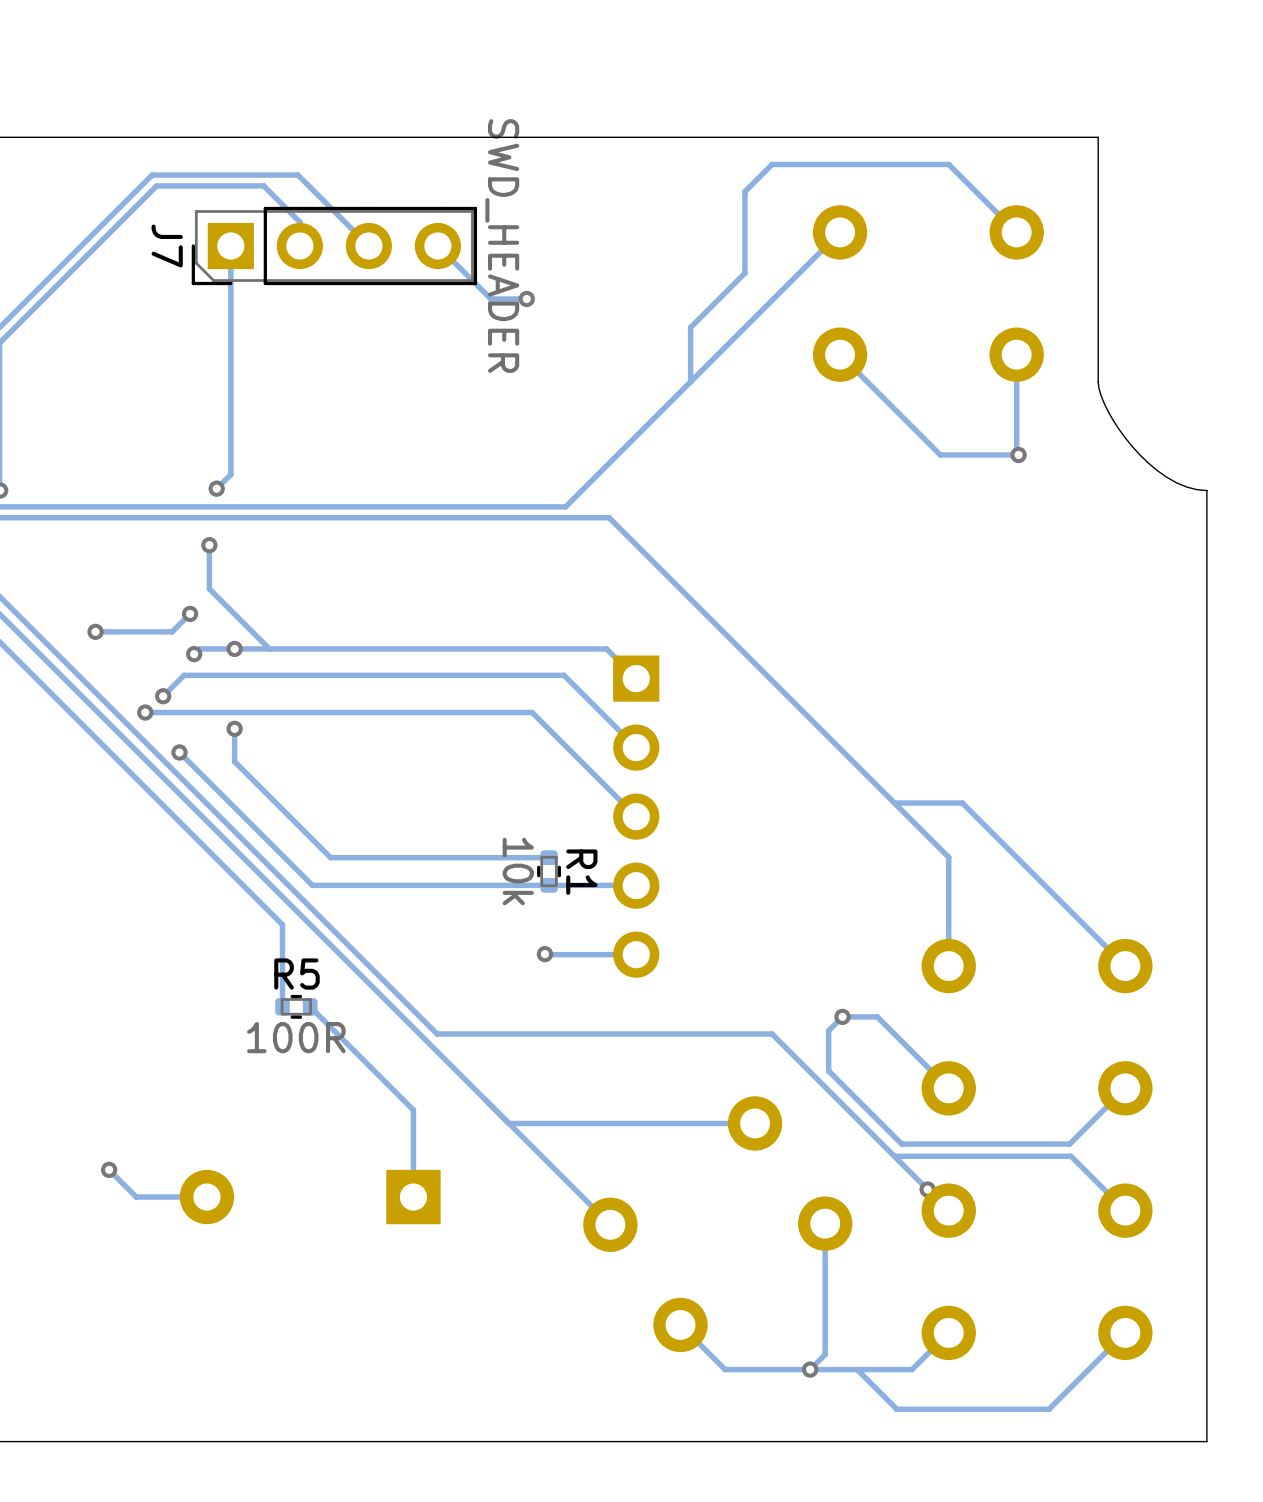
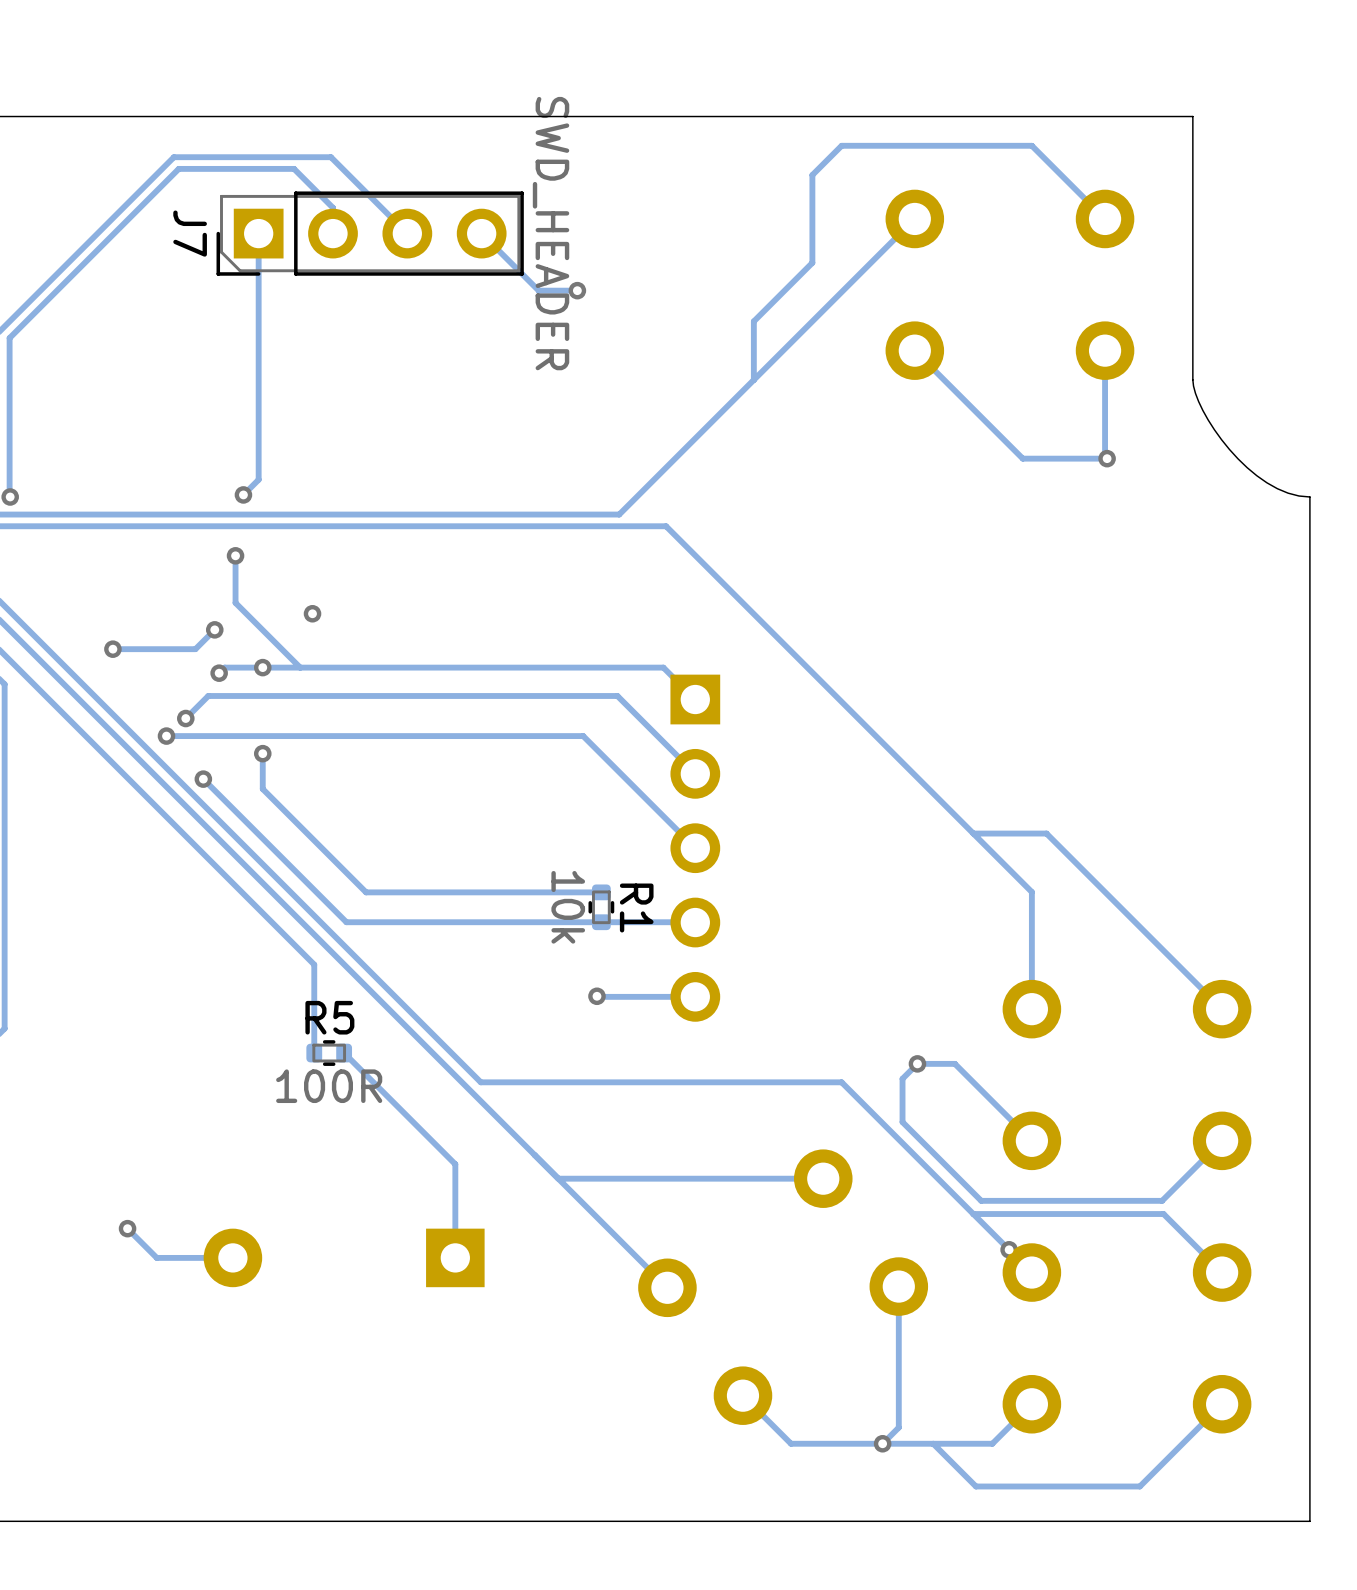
via: none -> (312, 613)

